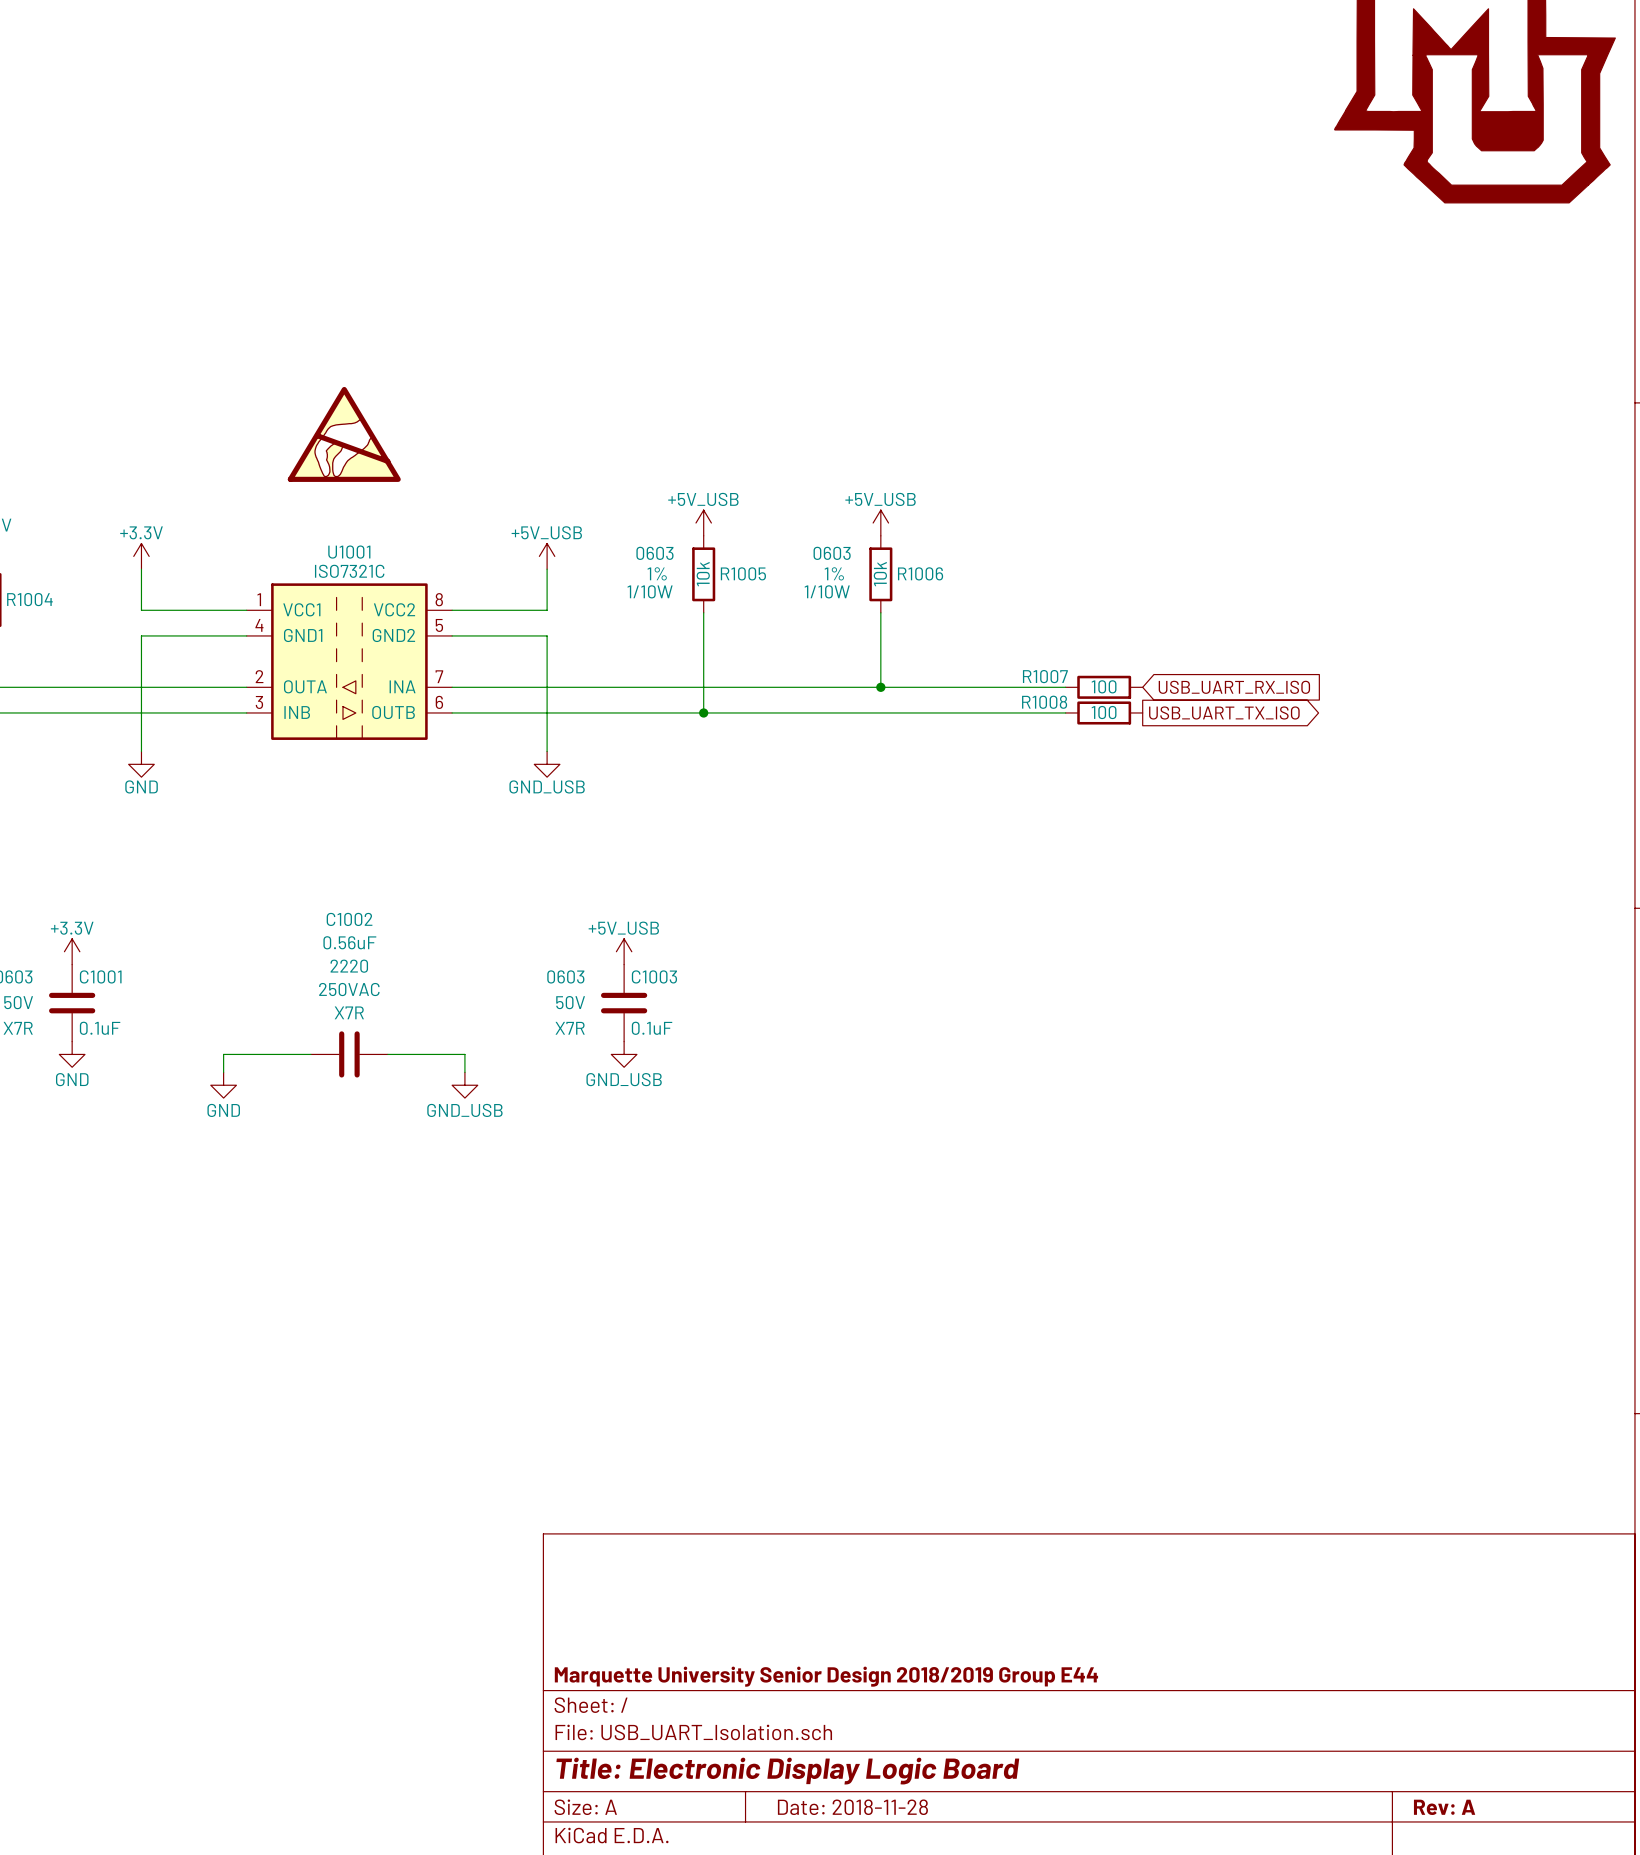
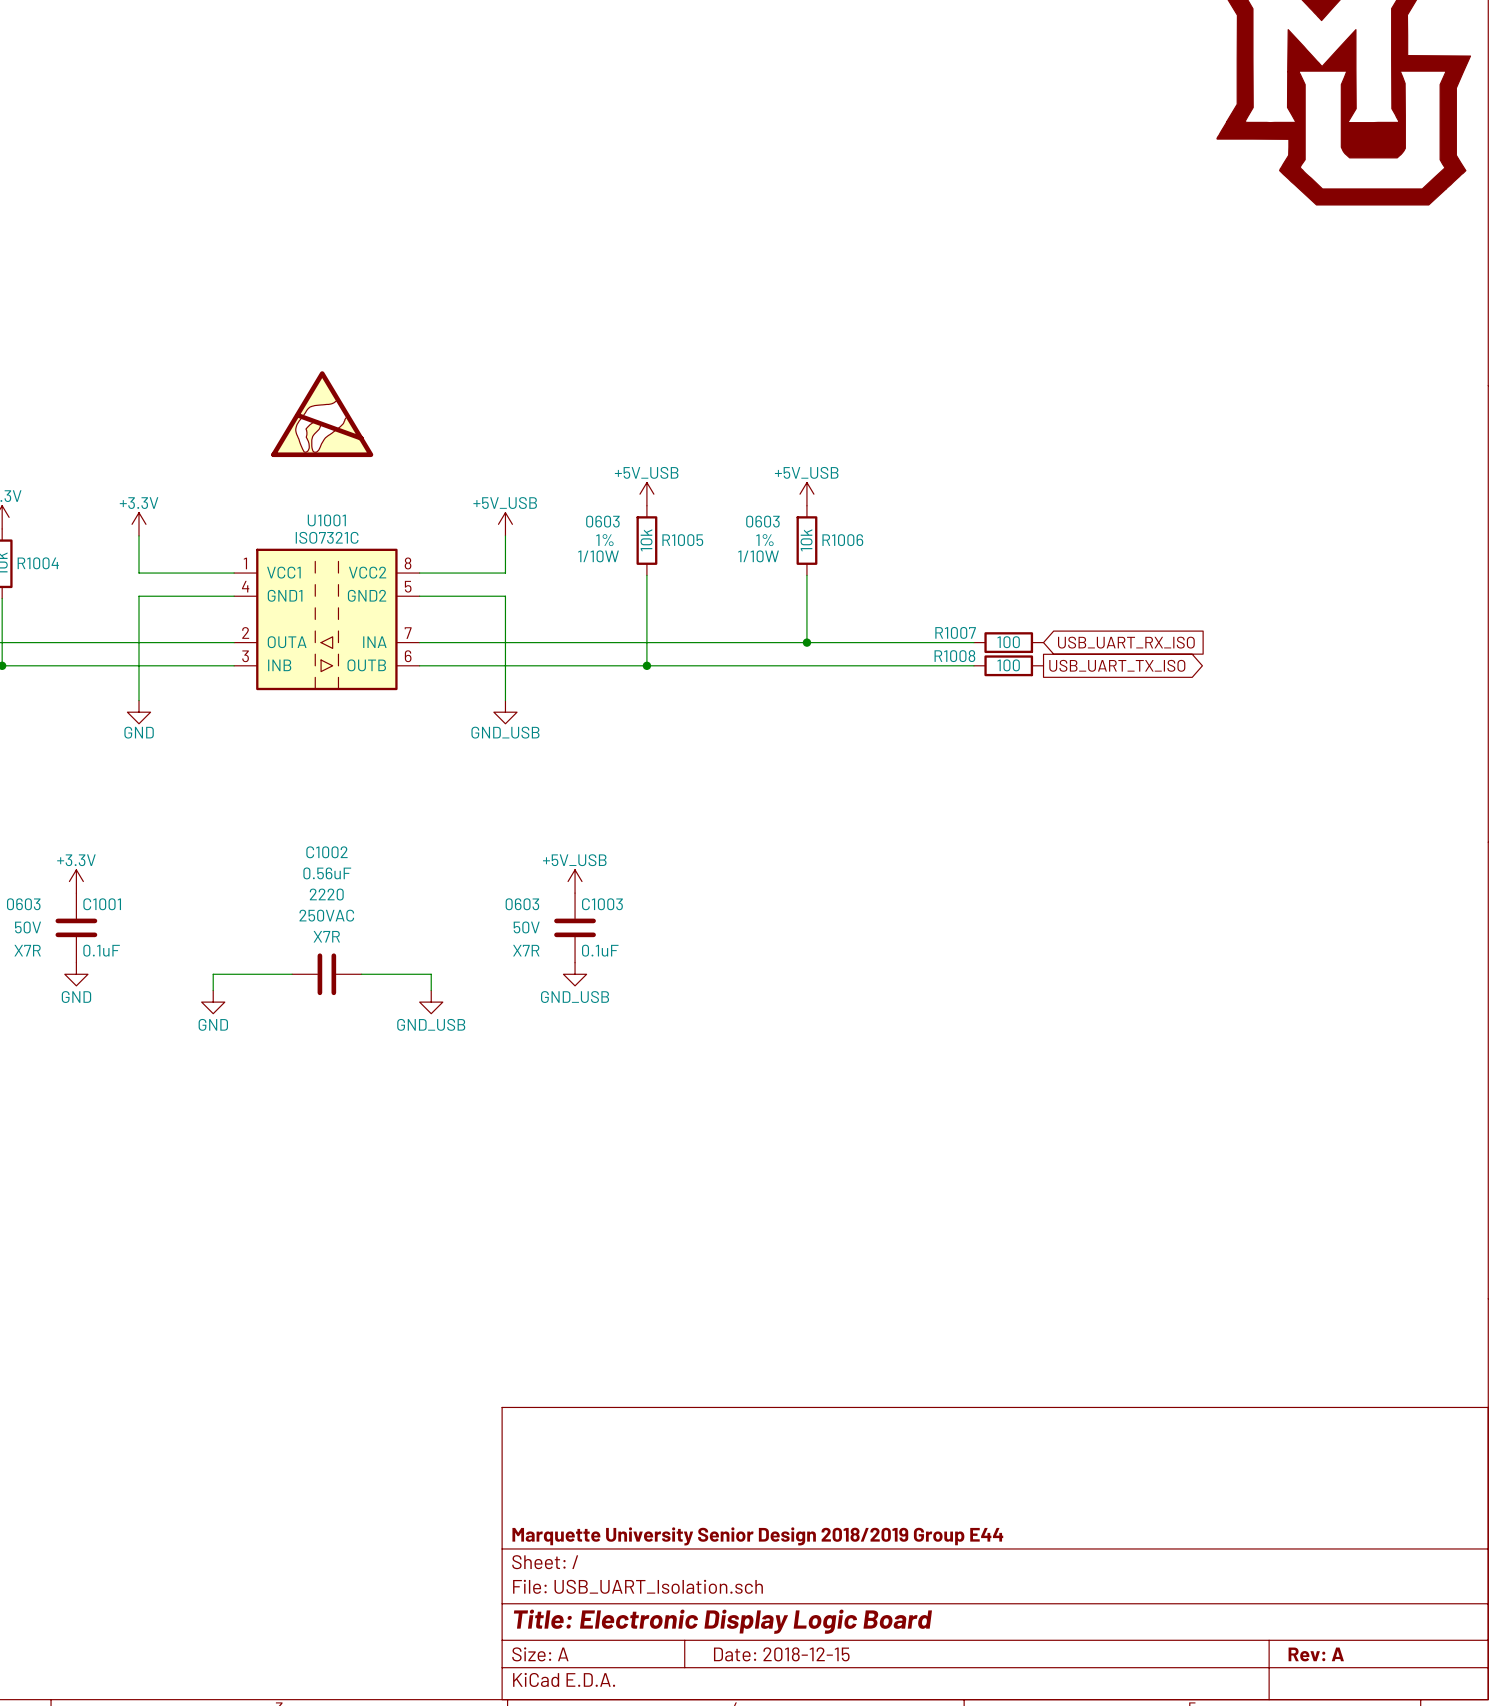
title block: Date: 2018-11-28 (852, 1807) -> Date: 2018-12-15 (781, 1654)

